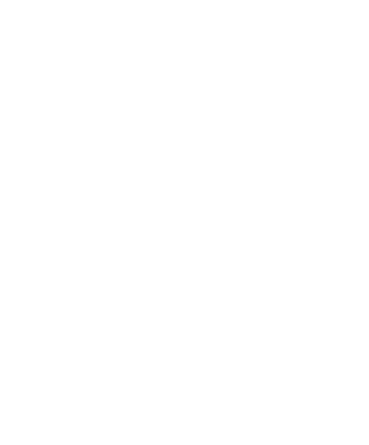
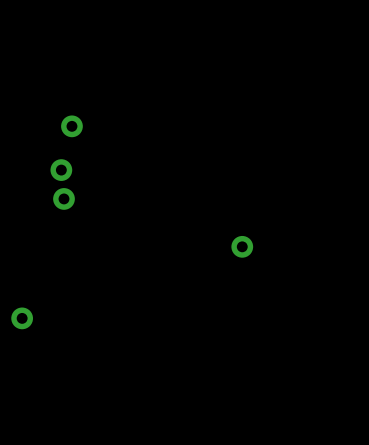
via: none -> (71, 126)
via: none -> (61, 170)
via: none -> (64, 198)
via: none -> (242, 246)
via: none -> (22, 318)

